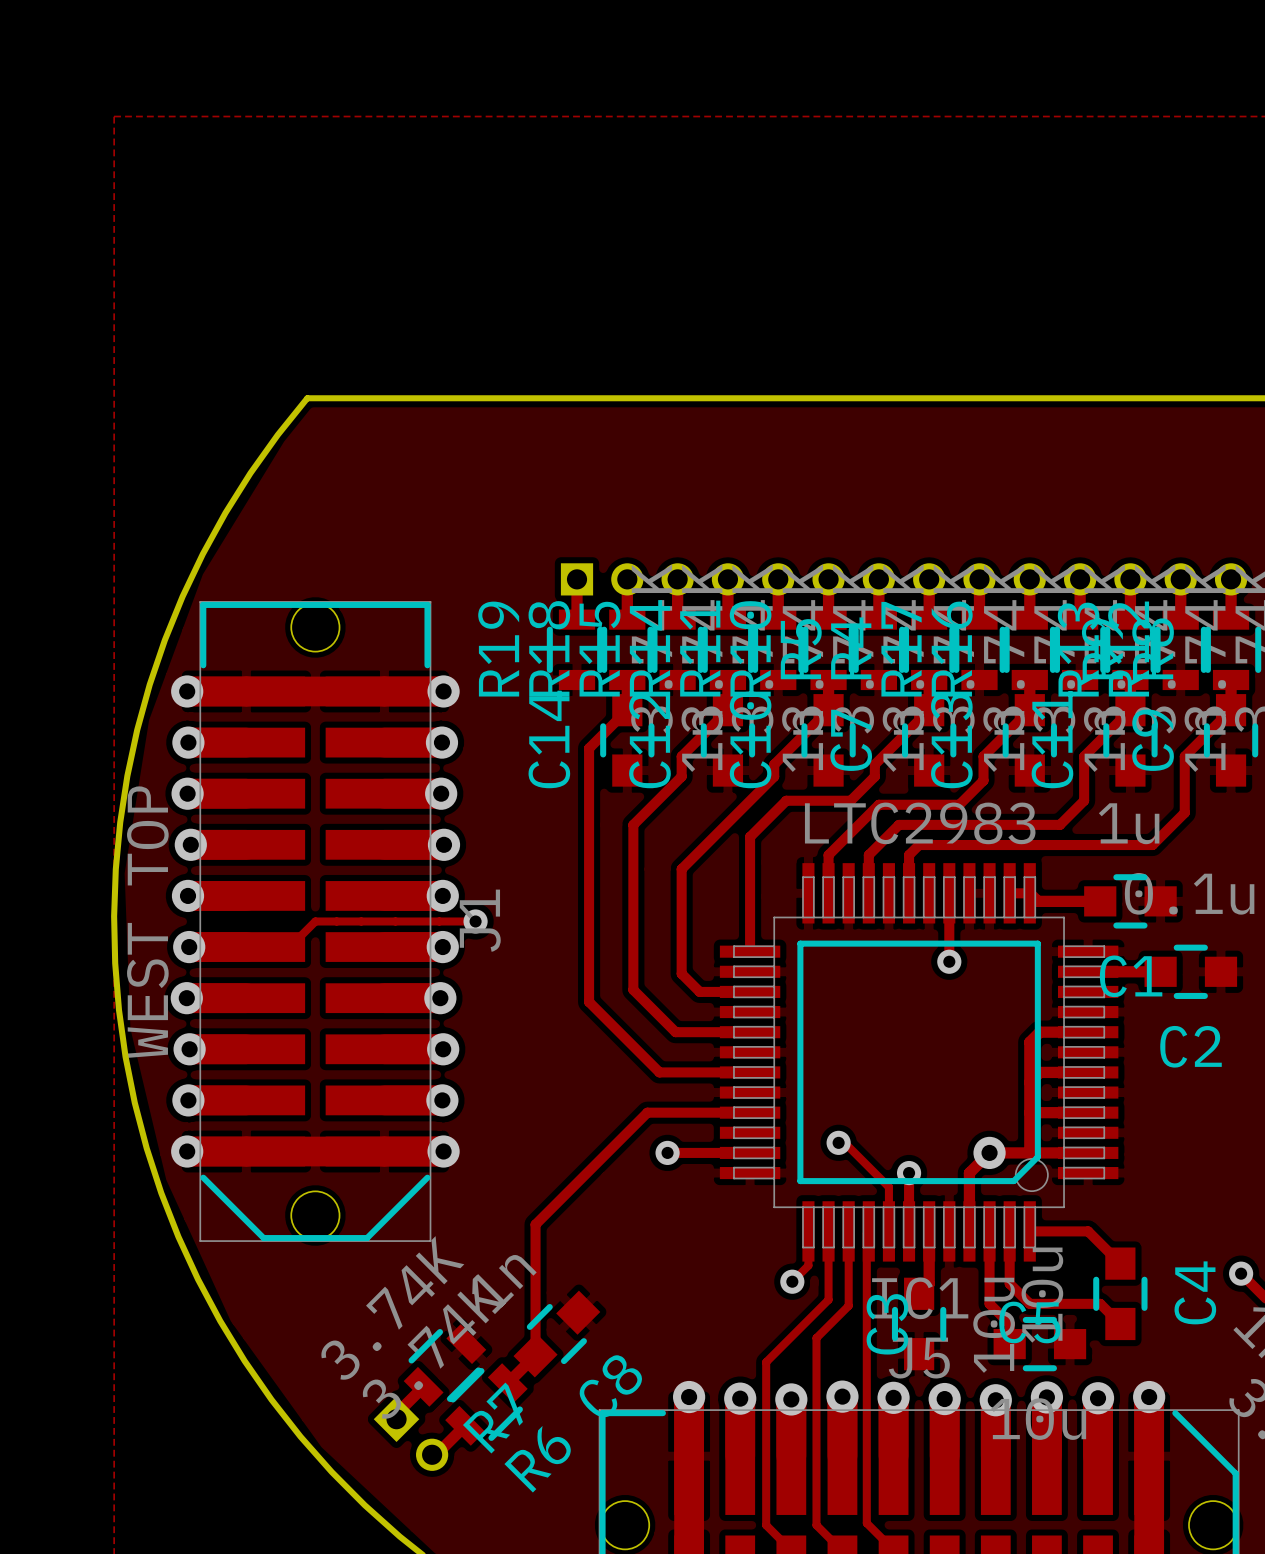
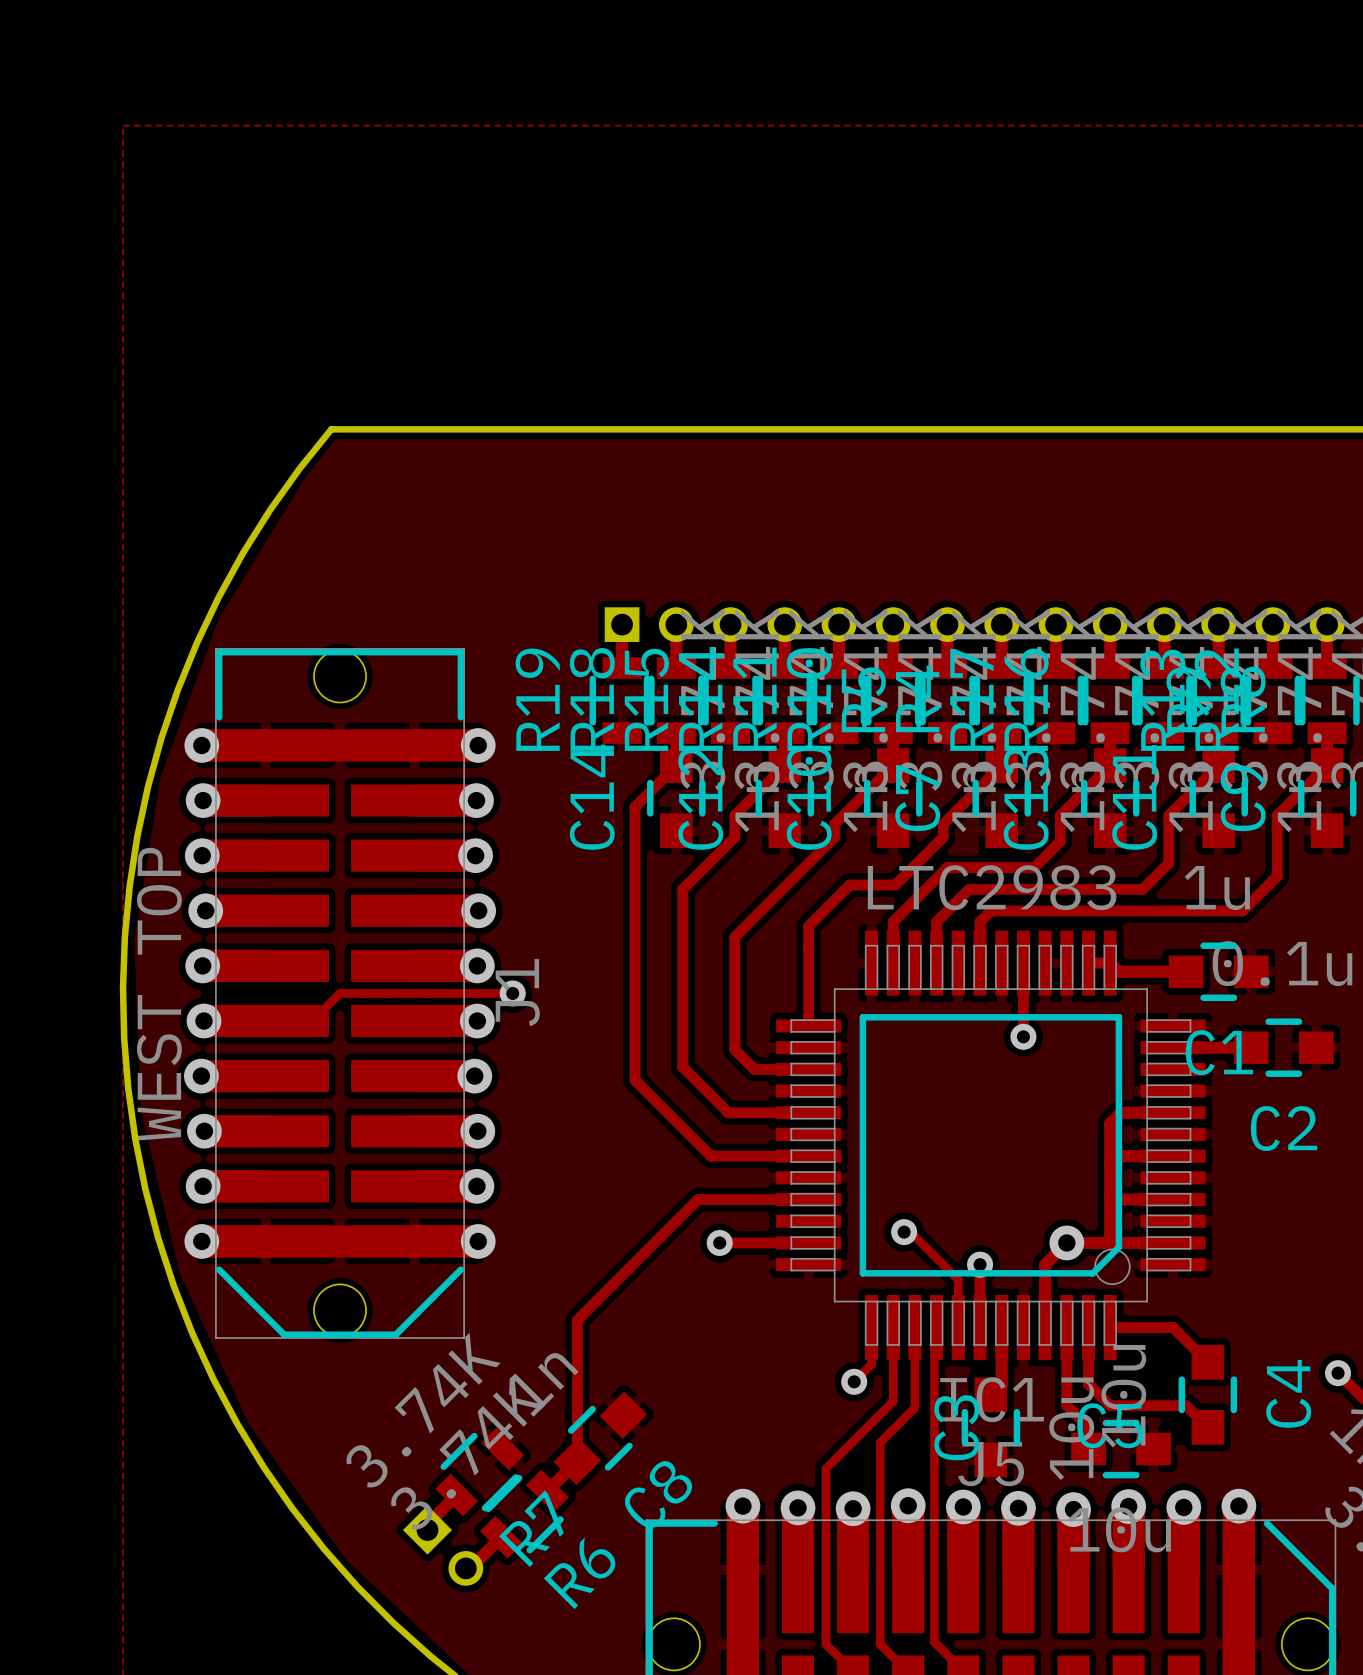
track: (850, 800) (786, 800) (750, 836) (750, 859) -> (917, 863) (895, 884) (849, 884) (808, 926)

